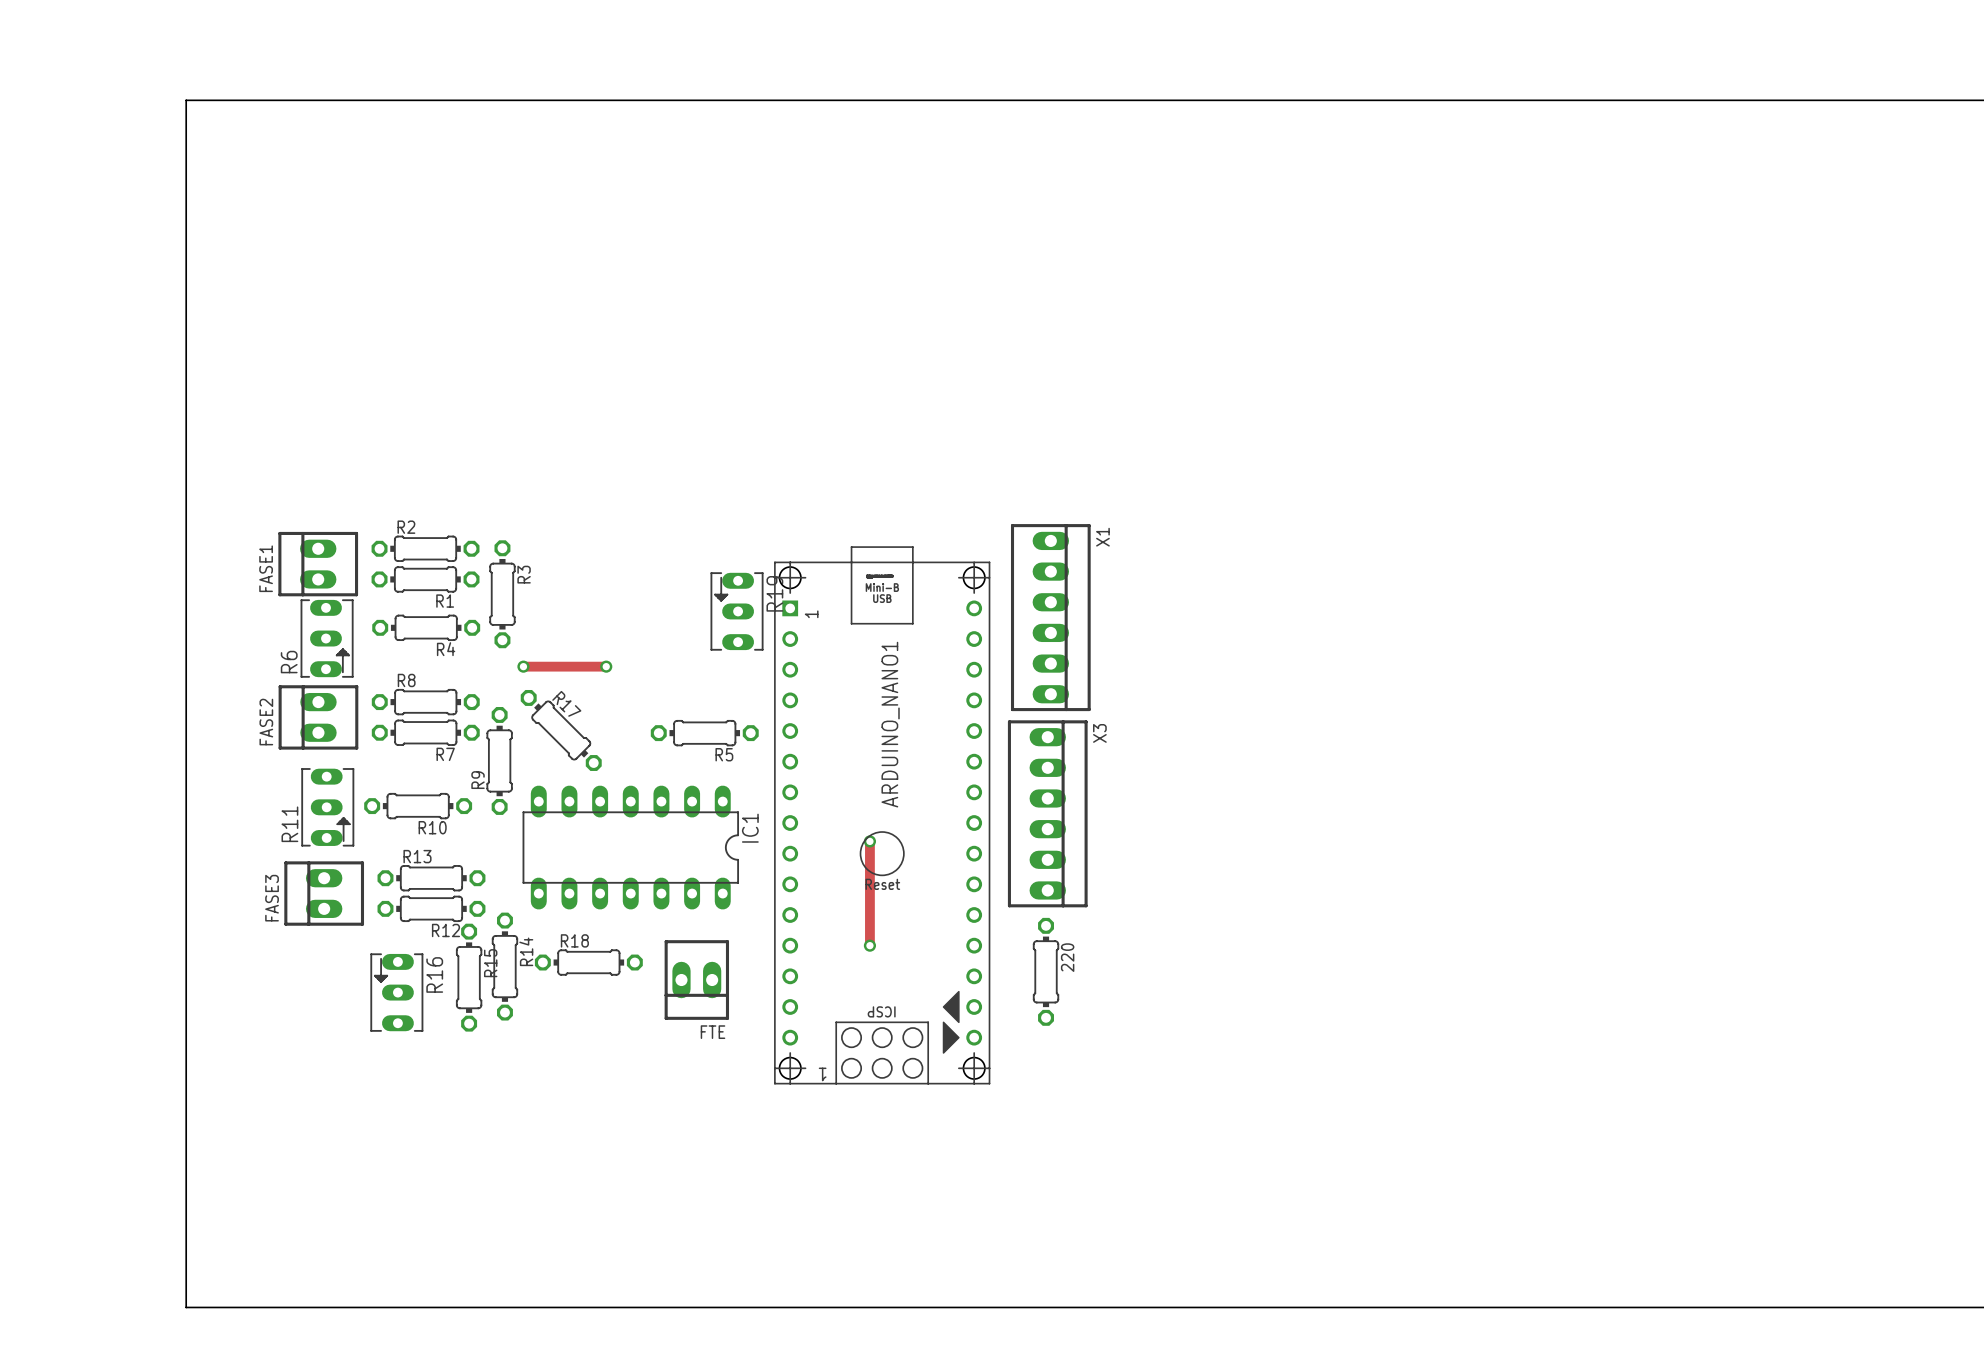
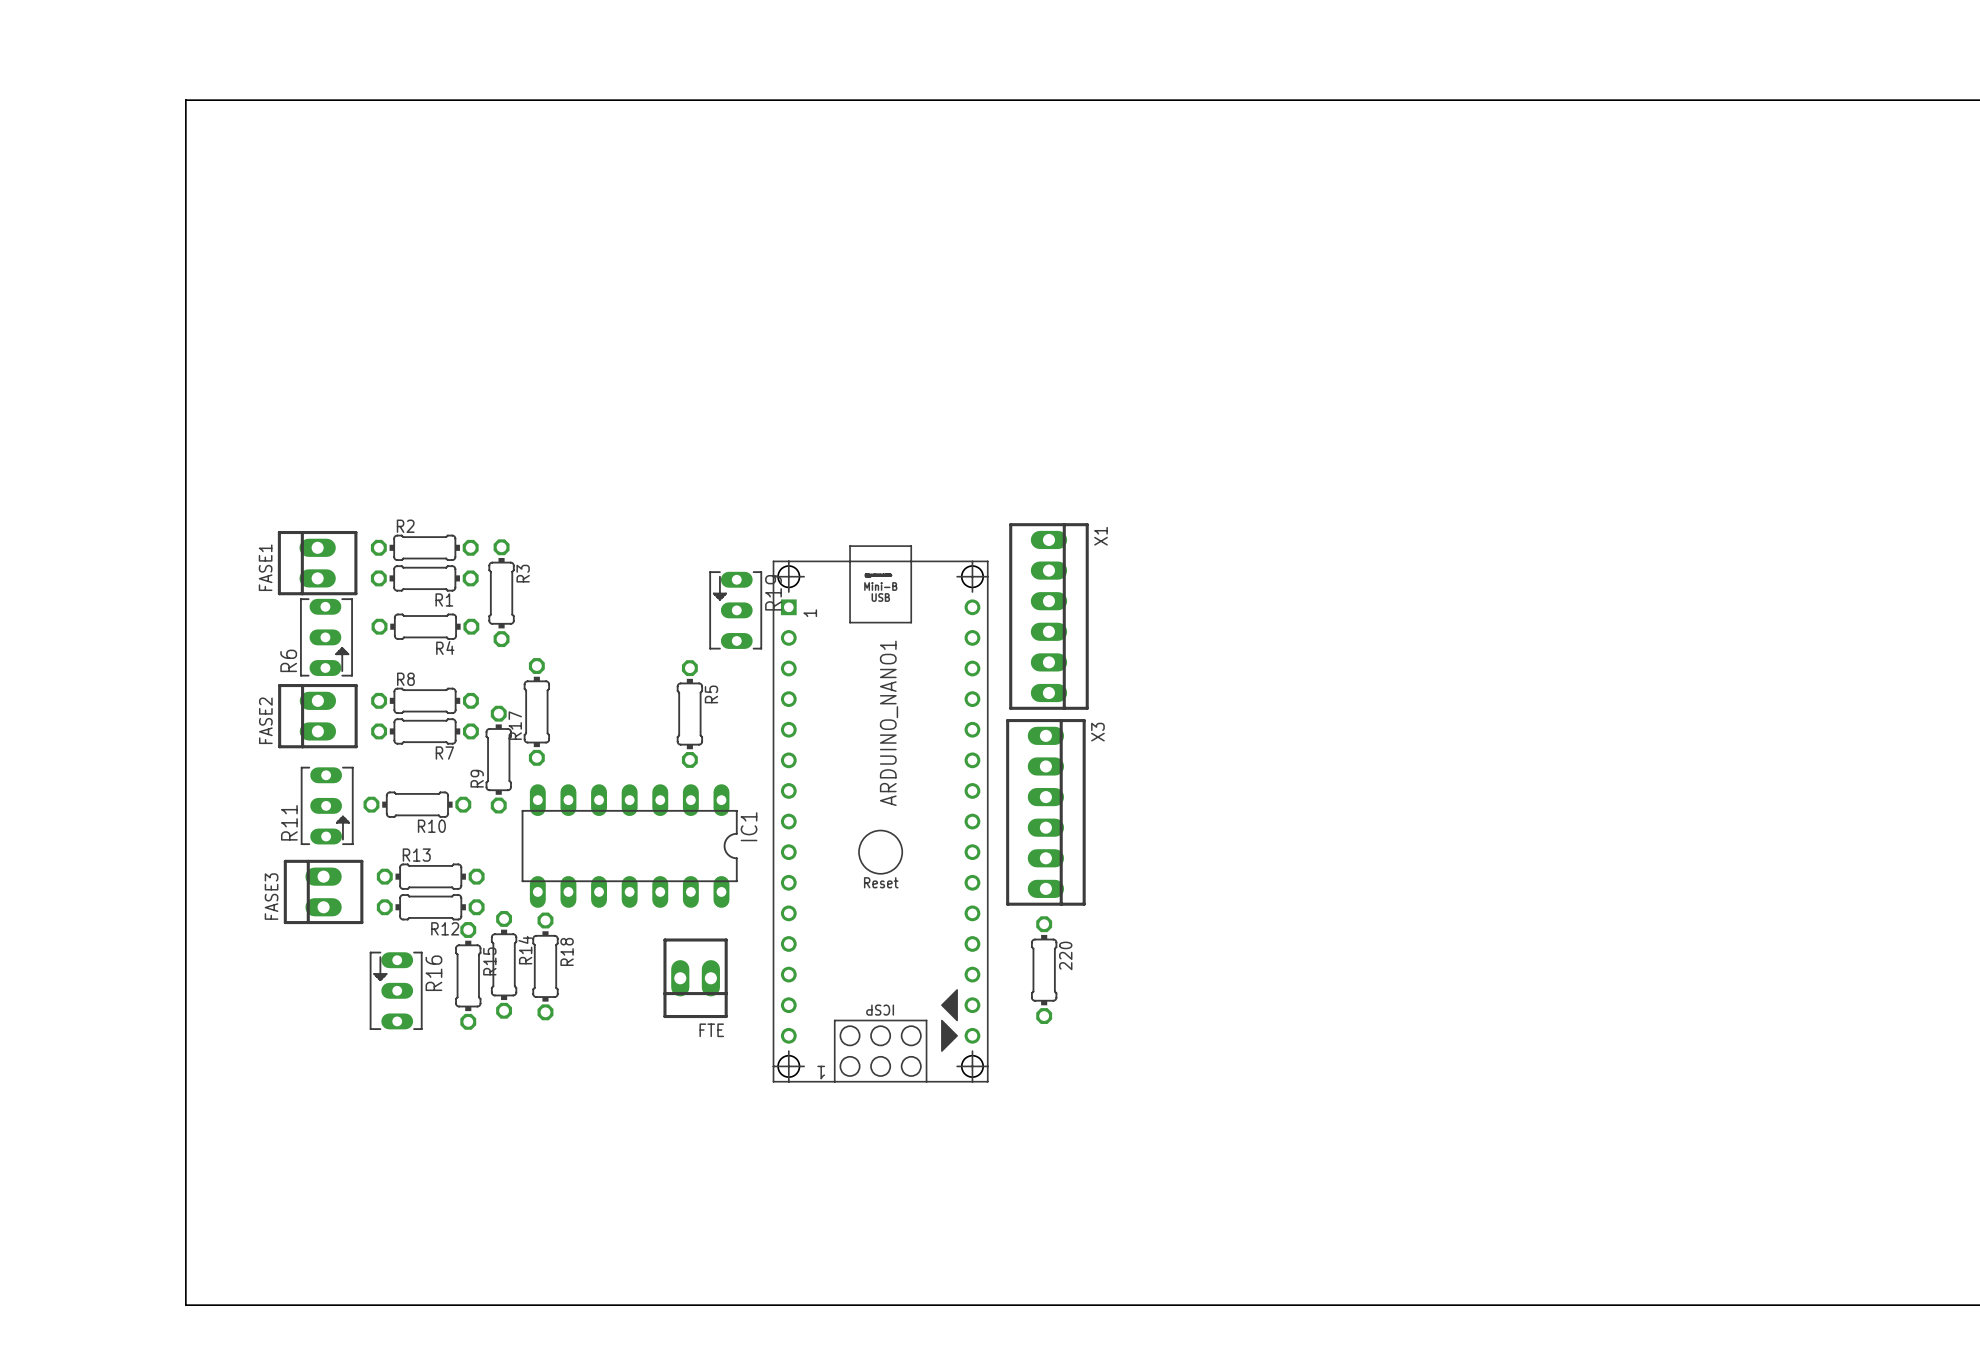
track: (523, 666) (606, 666) -> none
via: (523, 666) -> none
via: (606, 666) -> none
R17 name position: R17 (566, 703) -> R17 (515, 725)
R17 rotation: 0° (561, 730) -> 45° clockwise (536, 711)
R5 rotation: 0° (704, 733) -> 90° clockwise (689, 714)
R5 name position: R5 (724, 754) -> R5 (711, 694)
track: (869, 841) (869, 945) -> none
via: (869, 841) -> none
via: (869, 945) -> none
R18 rotation: 0° (588, 962) -> 90° clockwise (545, 966)

